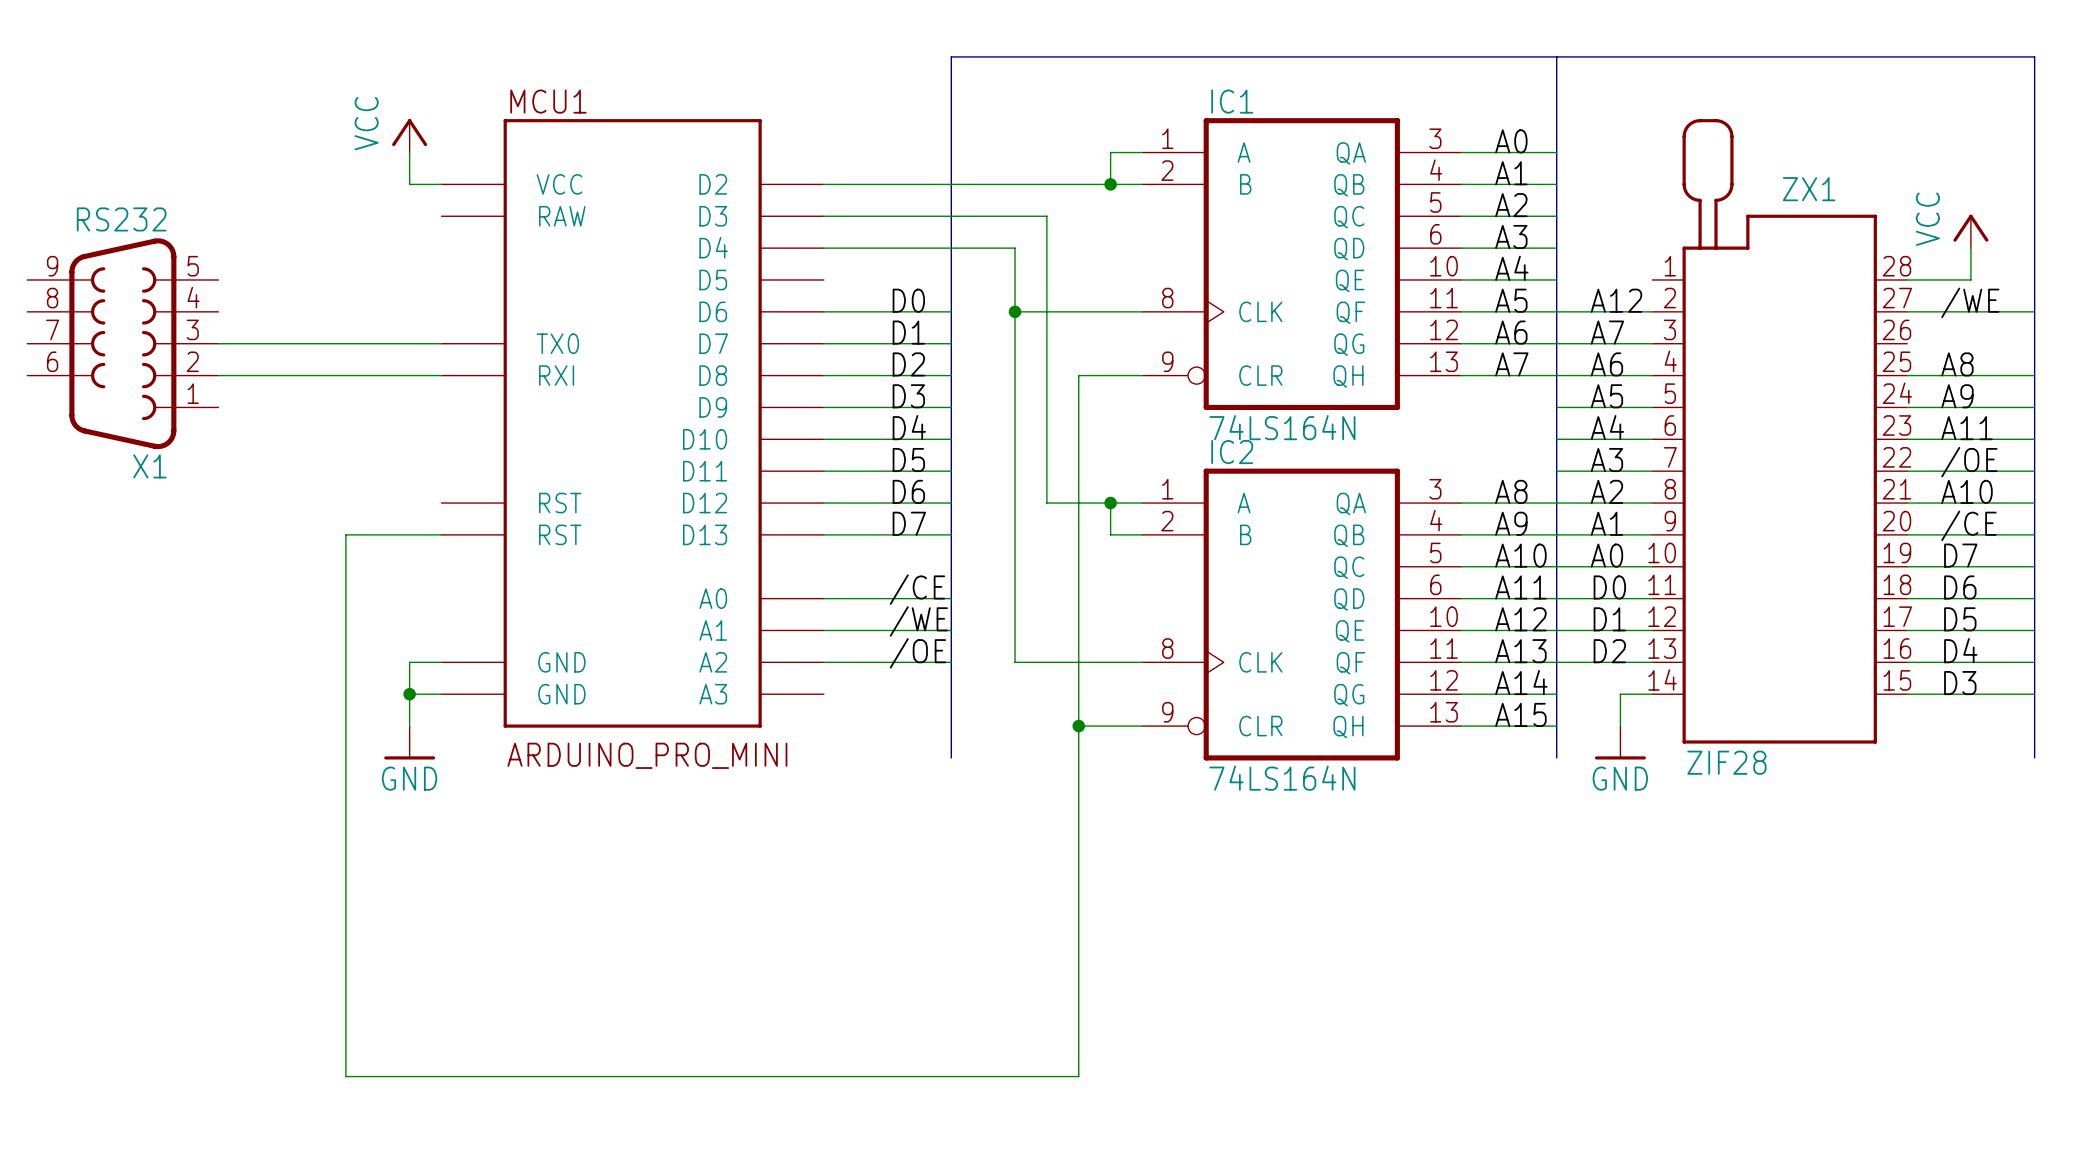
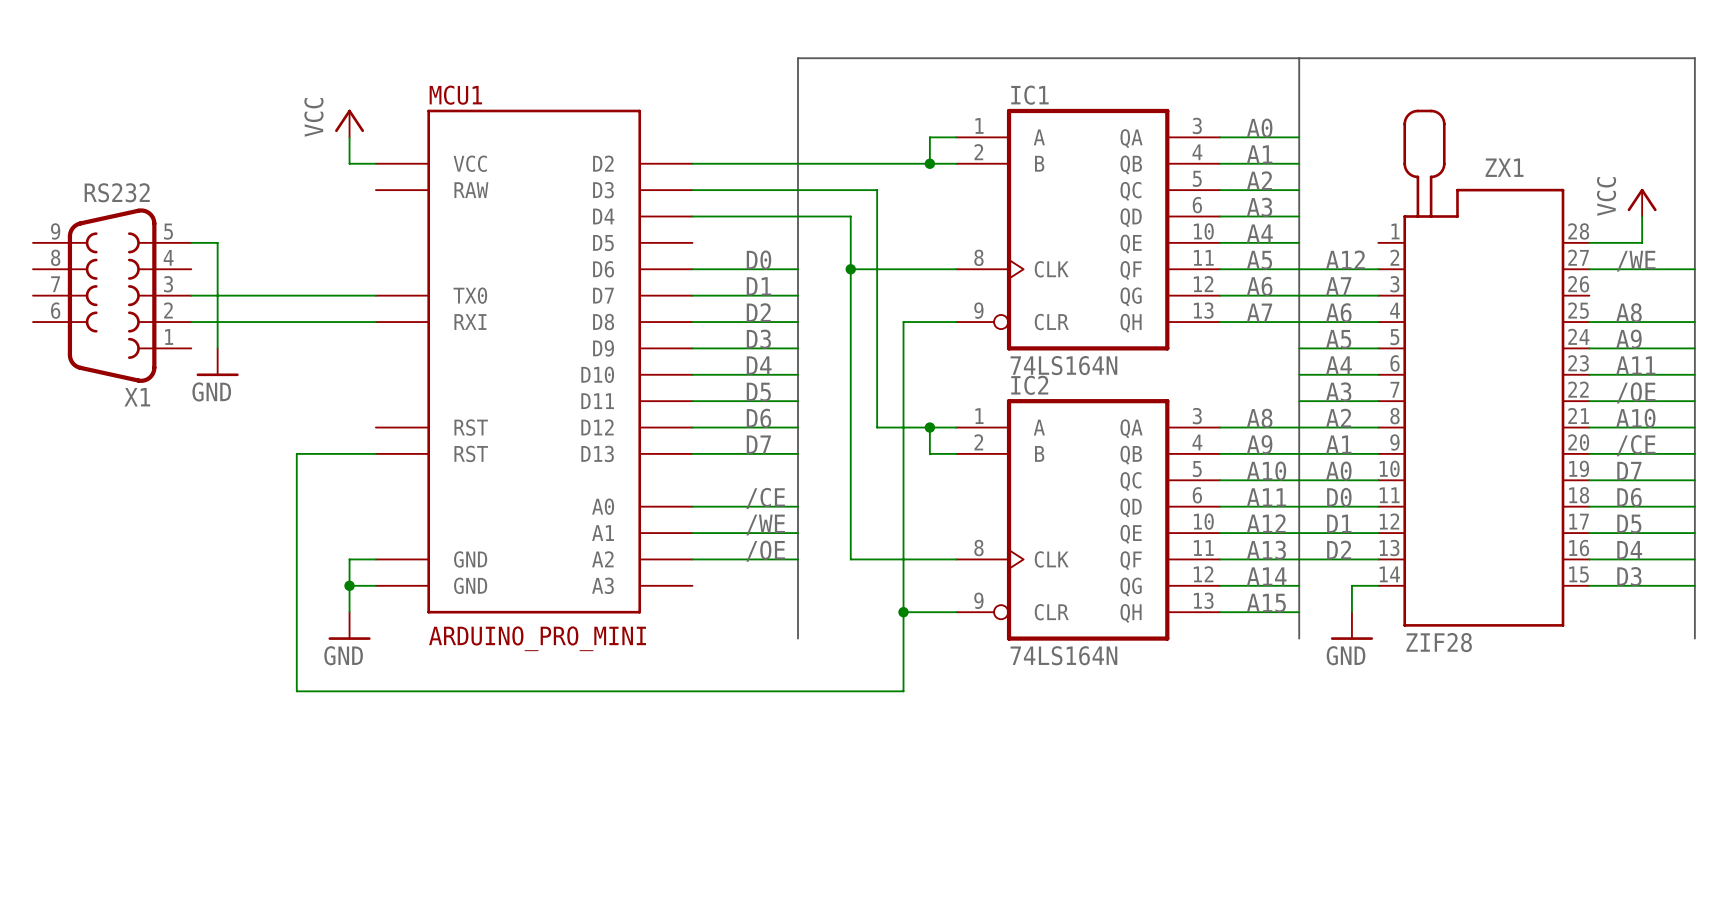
wire: none -> (191, 242) (217, 242) (217, 348)
power symbol: none -> GND (217, 362)
wire: (345, 821) (345, 1076) (1078, 1076) (1078, 821) -> (296, 691) (903, 691)

